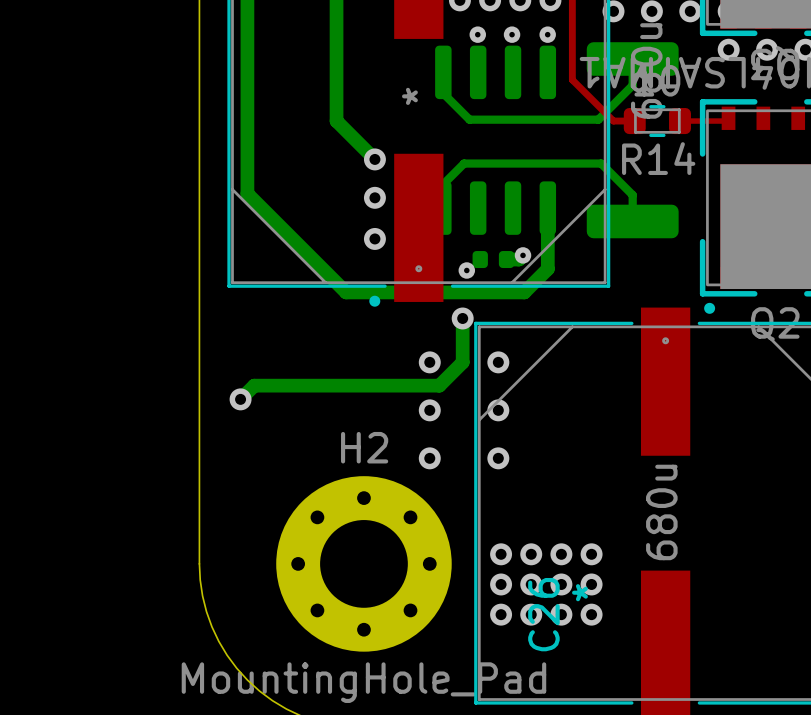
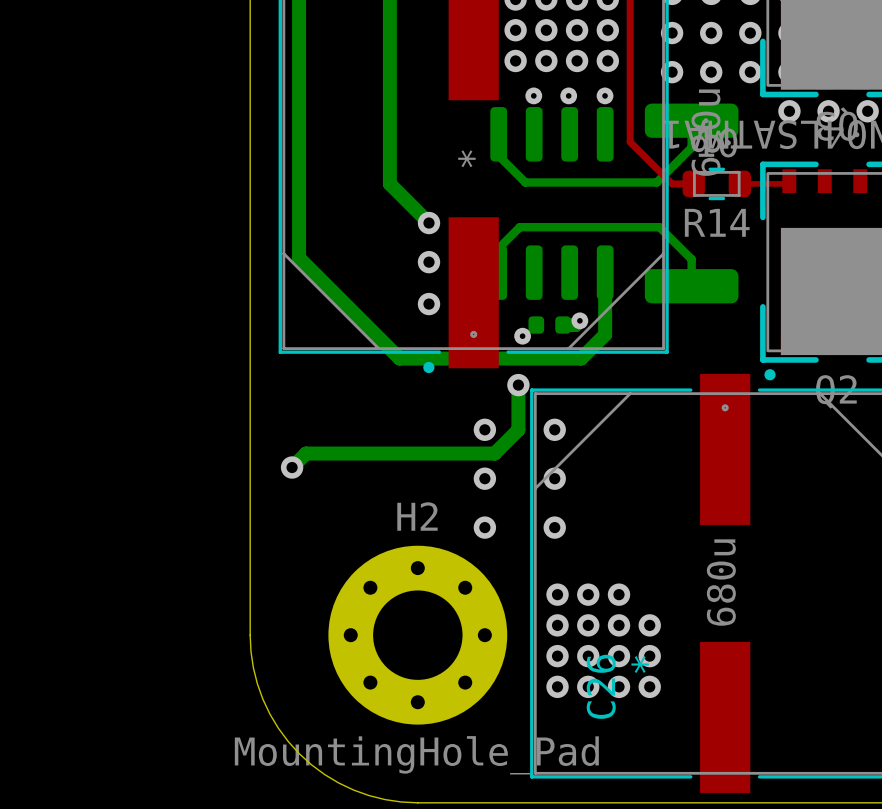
via: none -> (557, 594)
via: none -> (588, 594)
via: none -> (619, 594)

